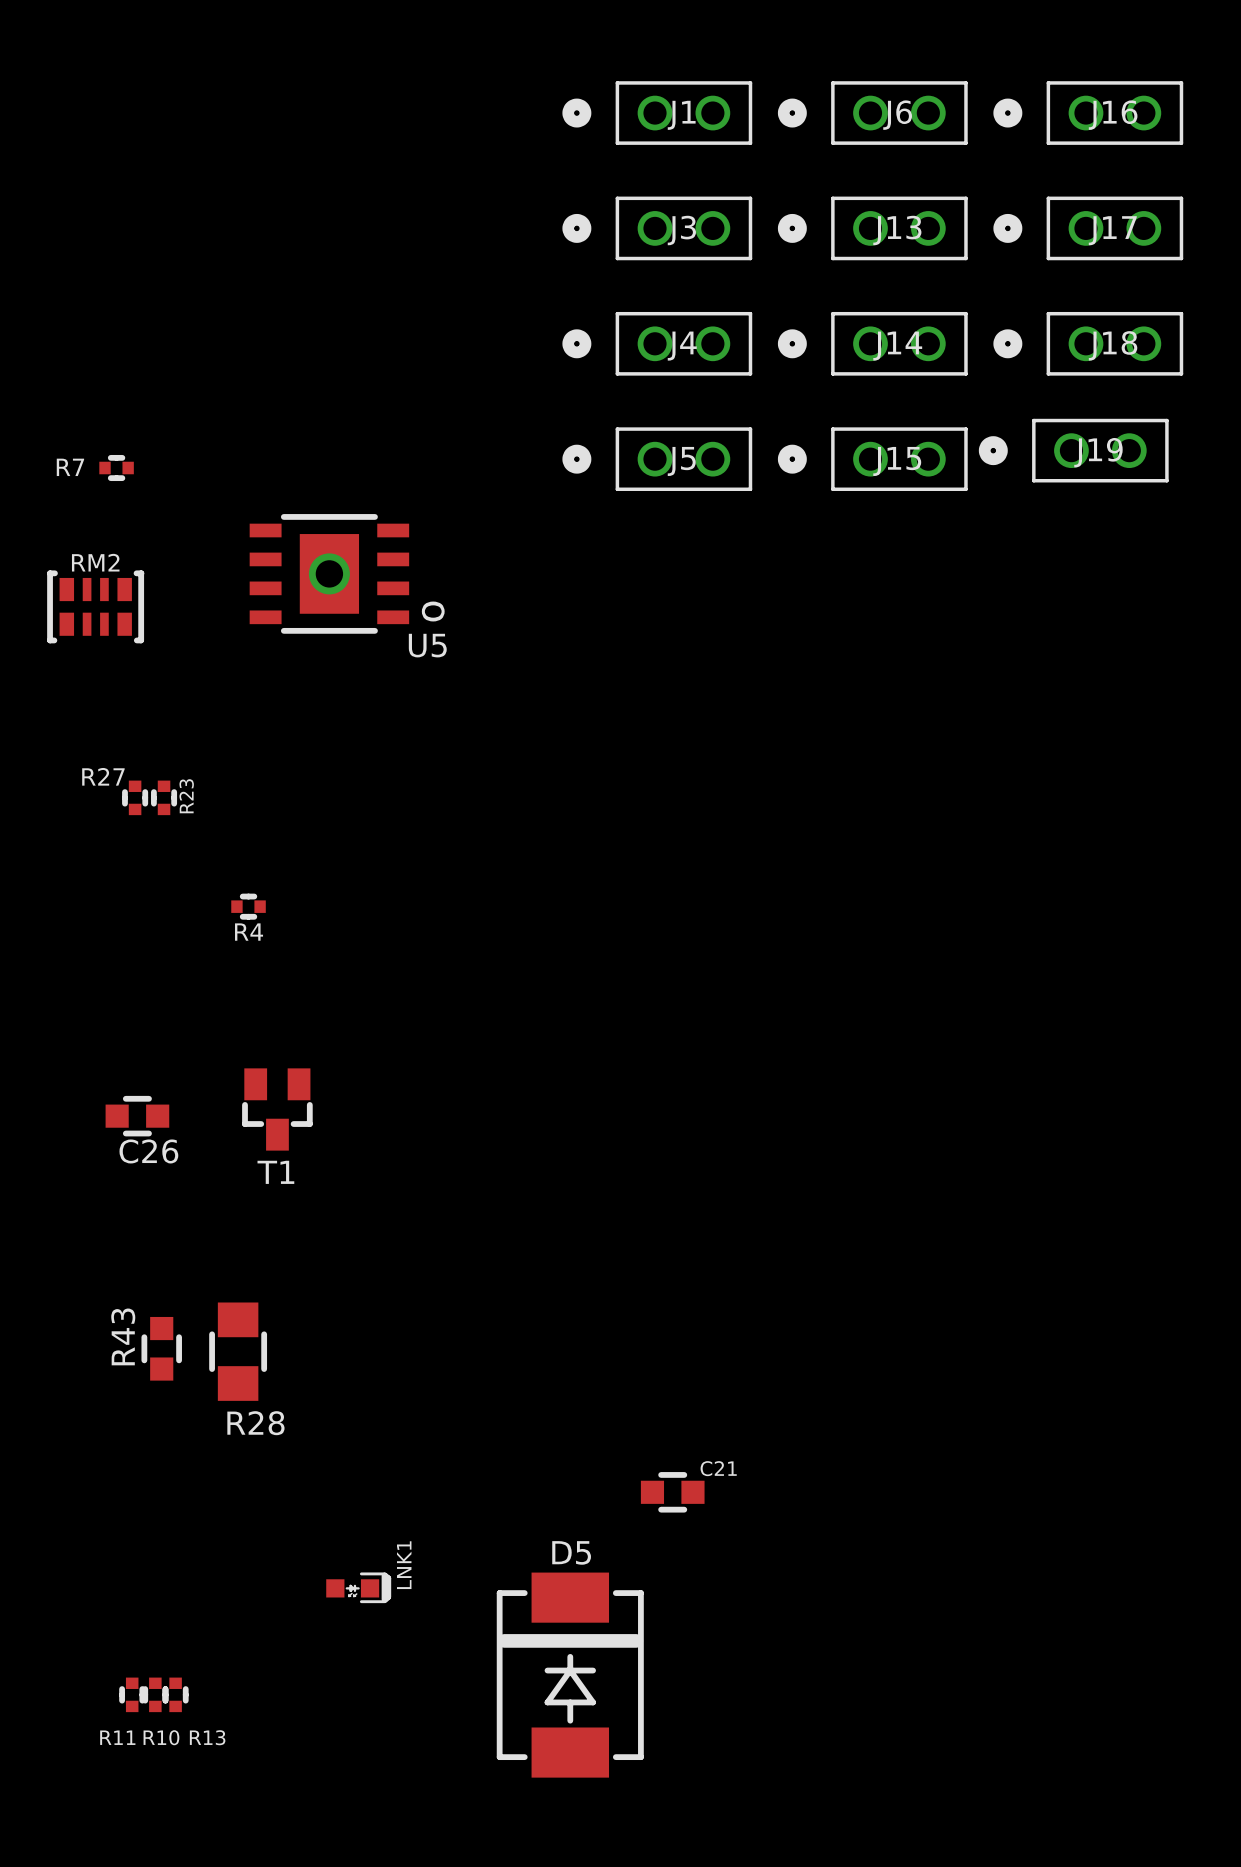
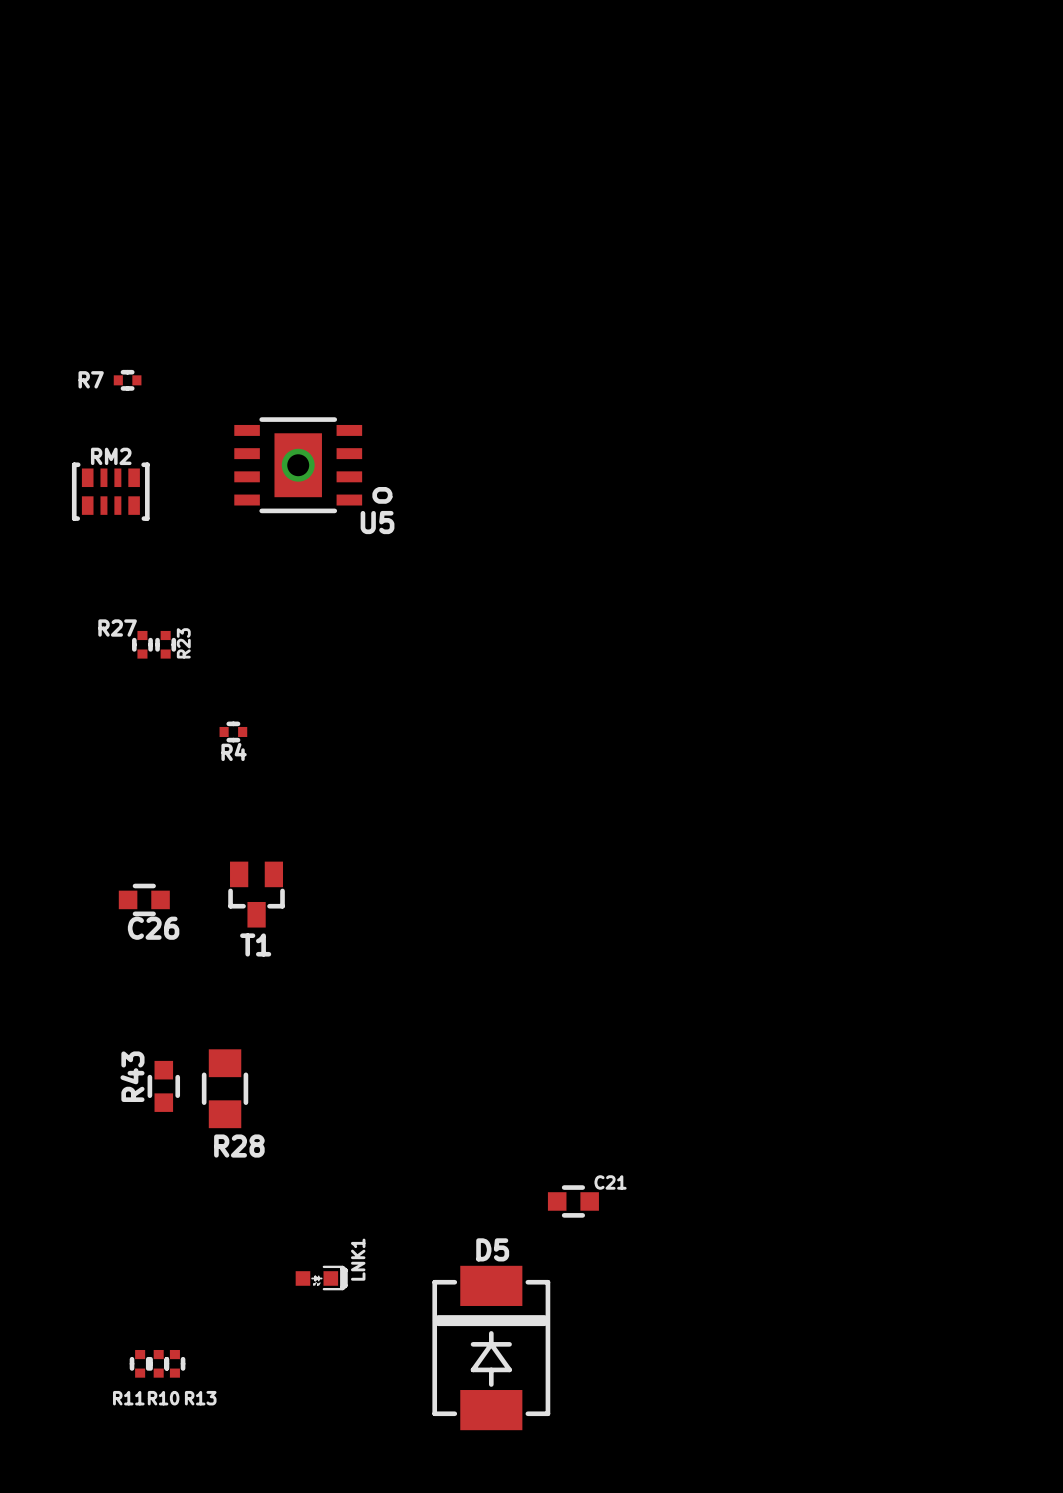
J1: (657, 113) -> none
J6: (872, 113) -> none
J16: (1088, 113) -> none
J3: (657, 228) -> none
J13: (872, 228) -> none
J17: (1088, 228) -> none
J4: (657, 343) -> none
J14: (872, 343) -> none
J18: (1088, 343) -> none
J19: (1073, 450) -> none
J5: (657, 459) -> none
J15: (872, 459) -> none

